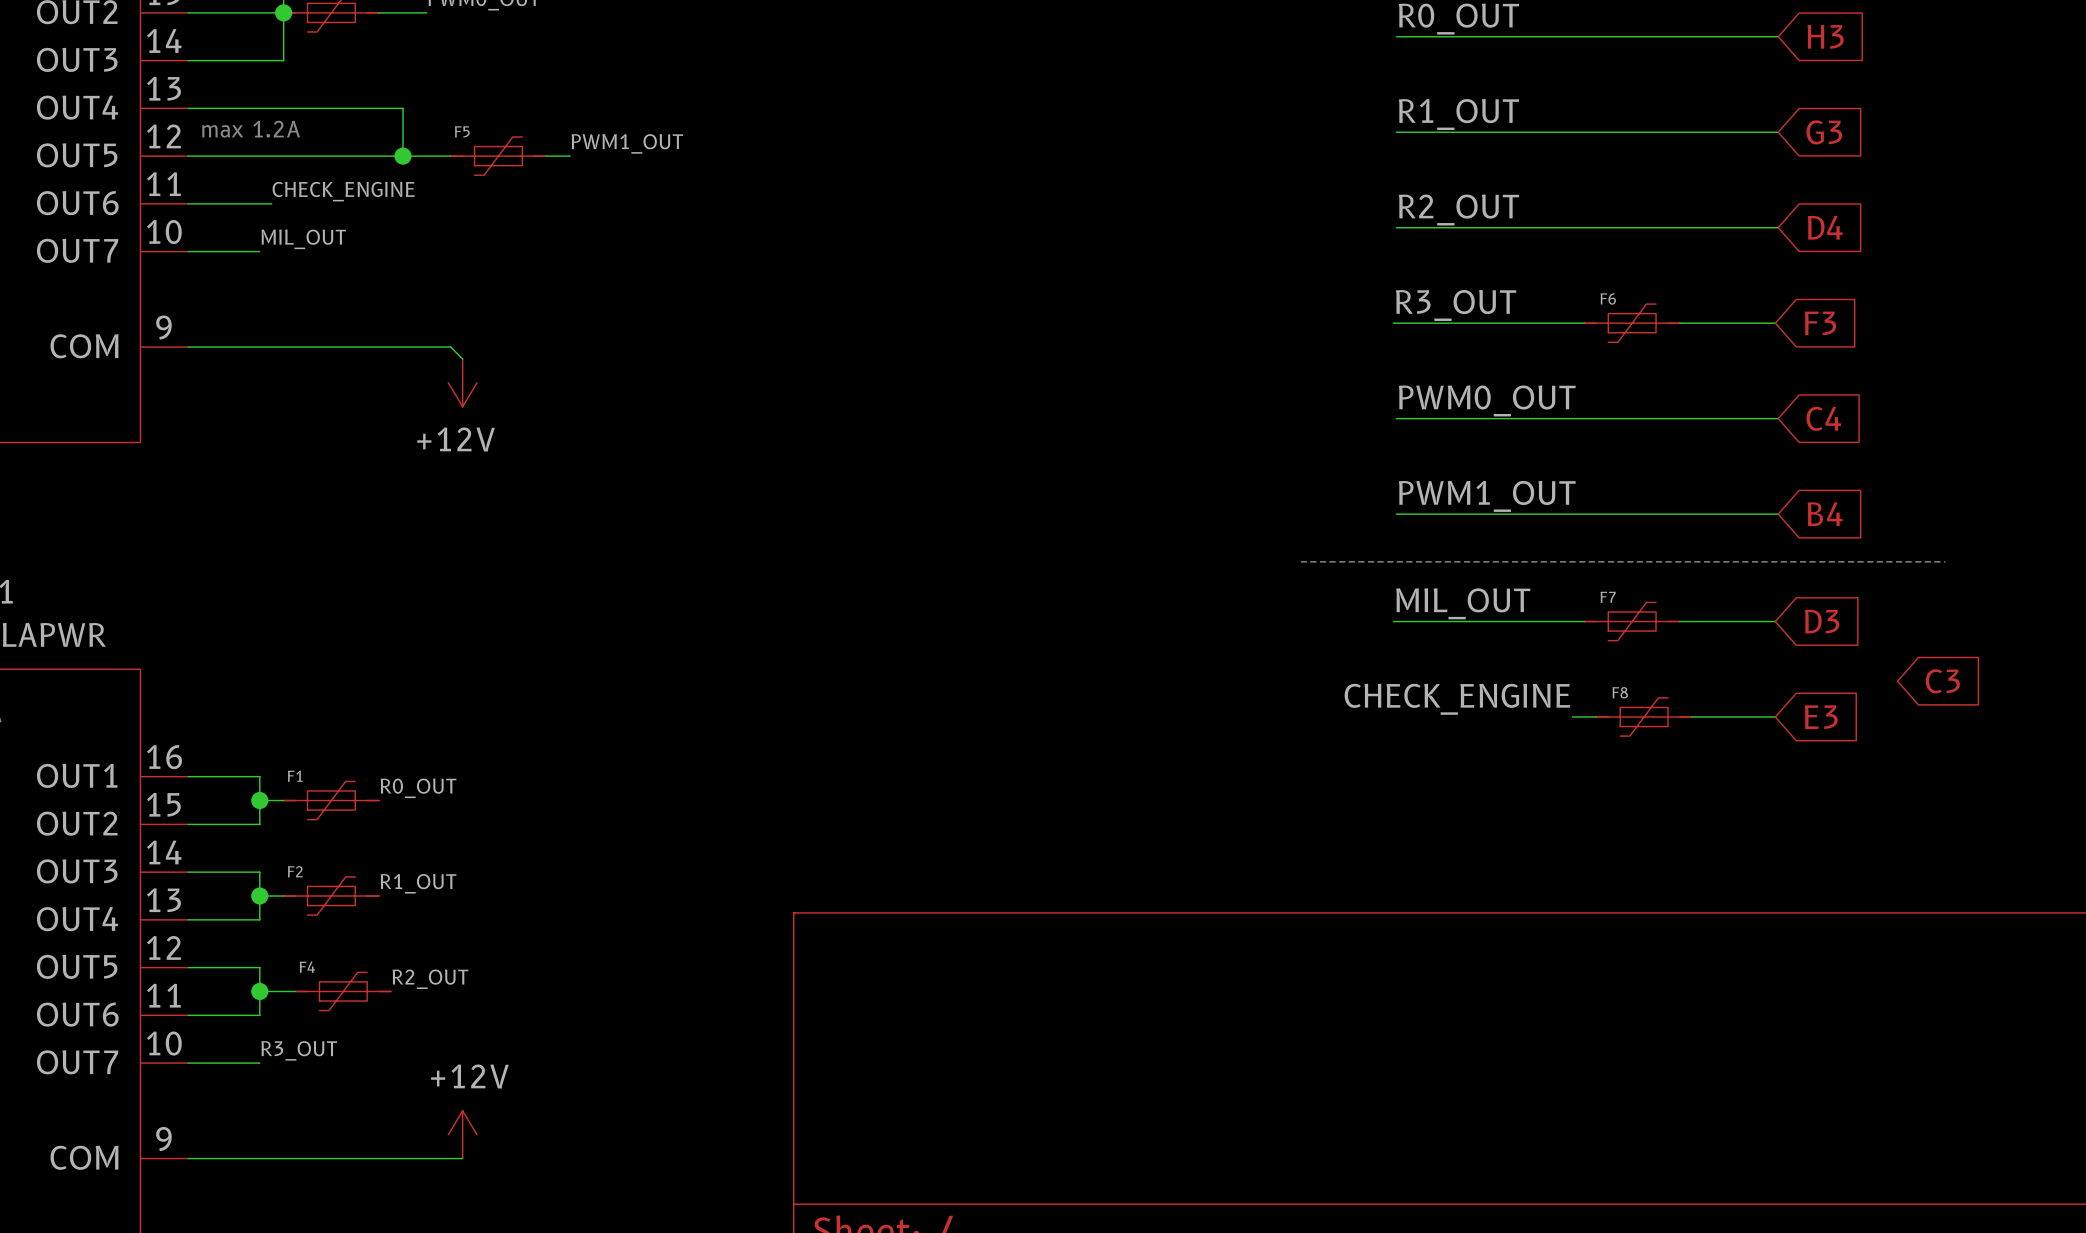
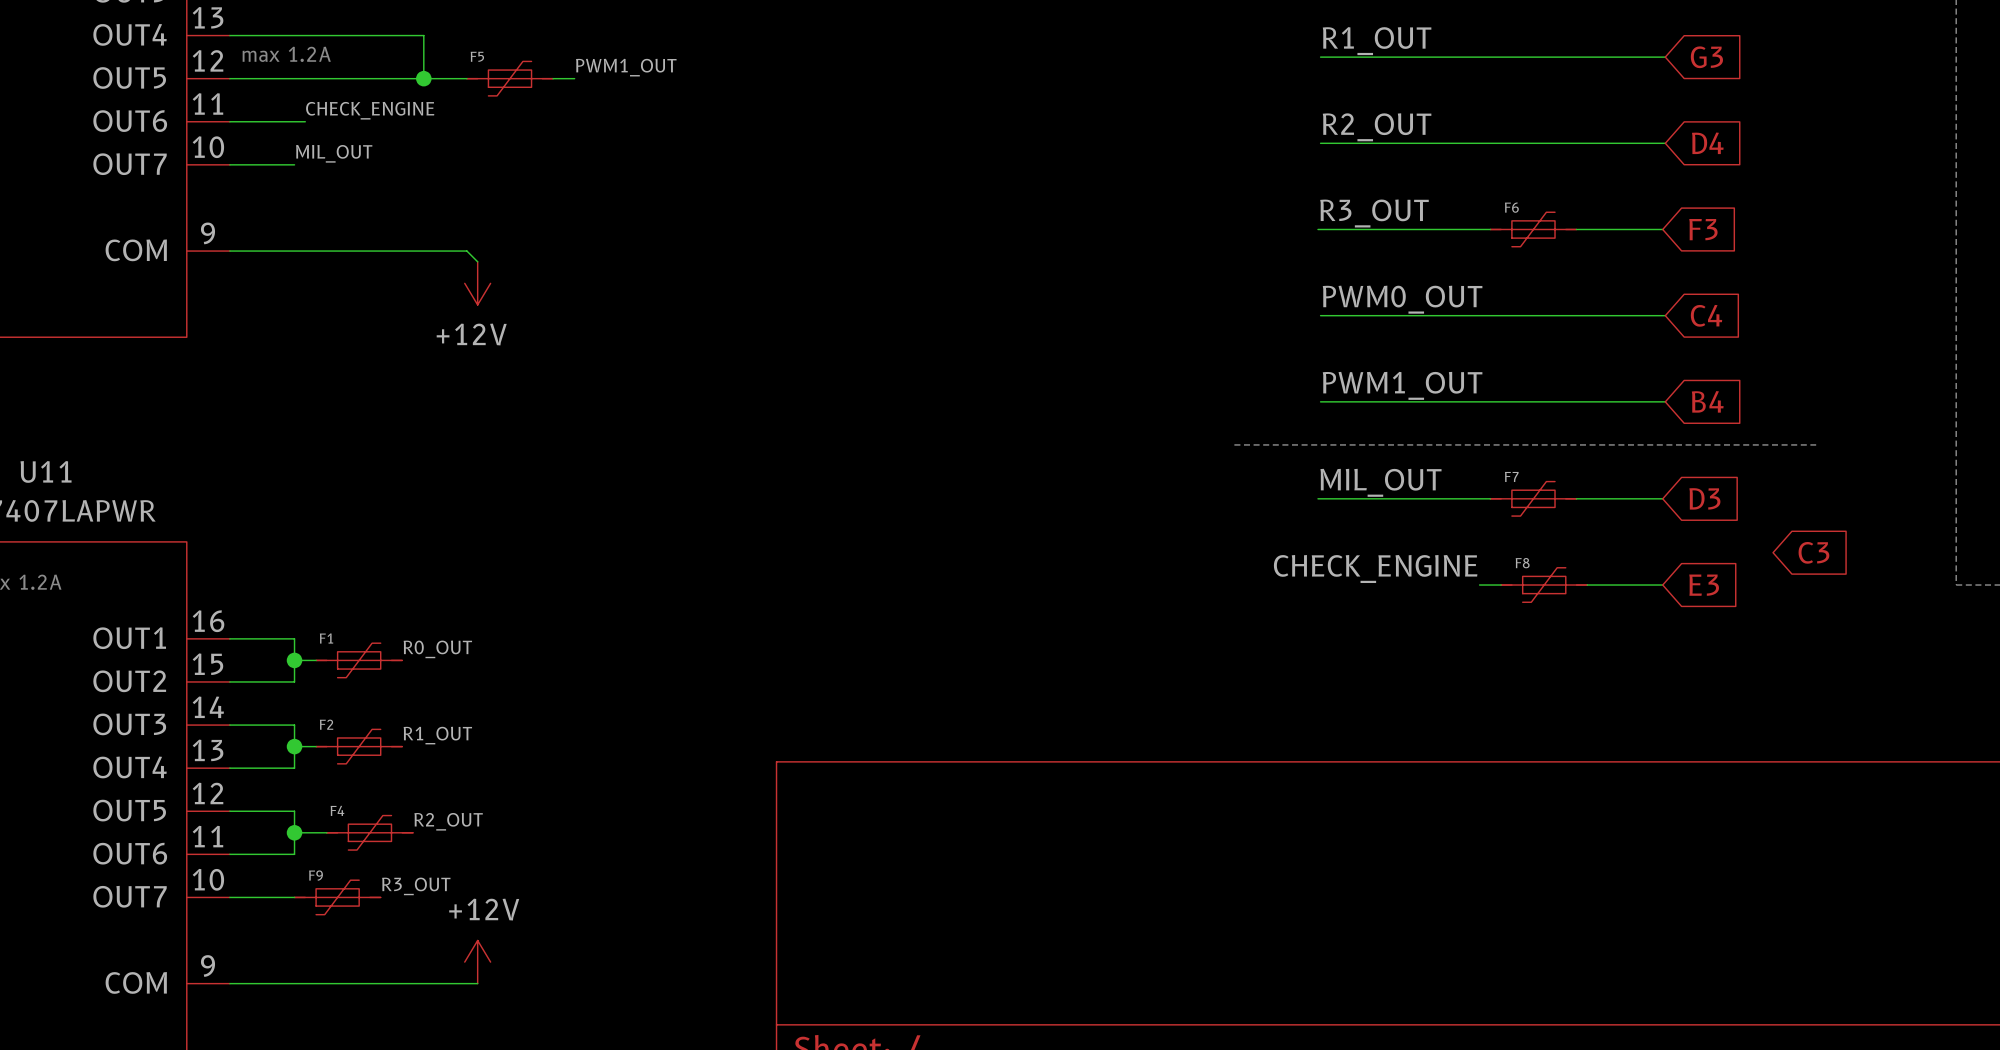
label position: R3_OUT (299, 1050) -> R3_OUT (416, 886)
F9: none -> (337, 897)

